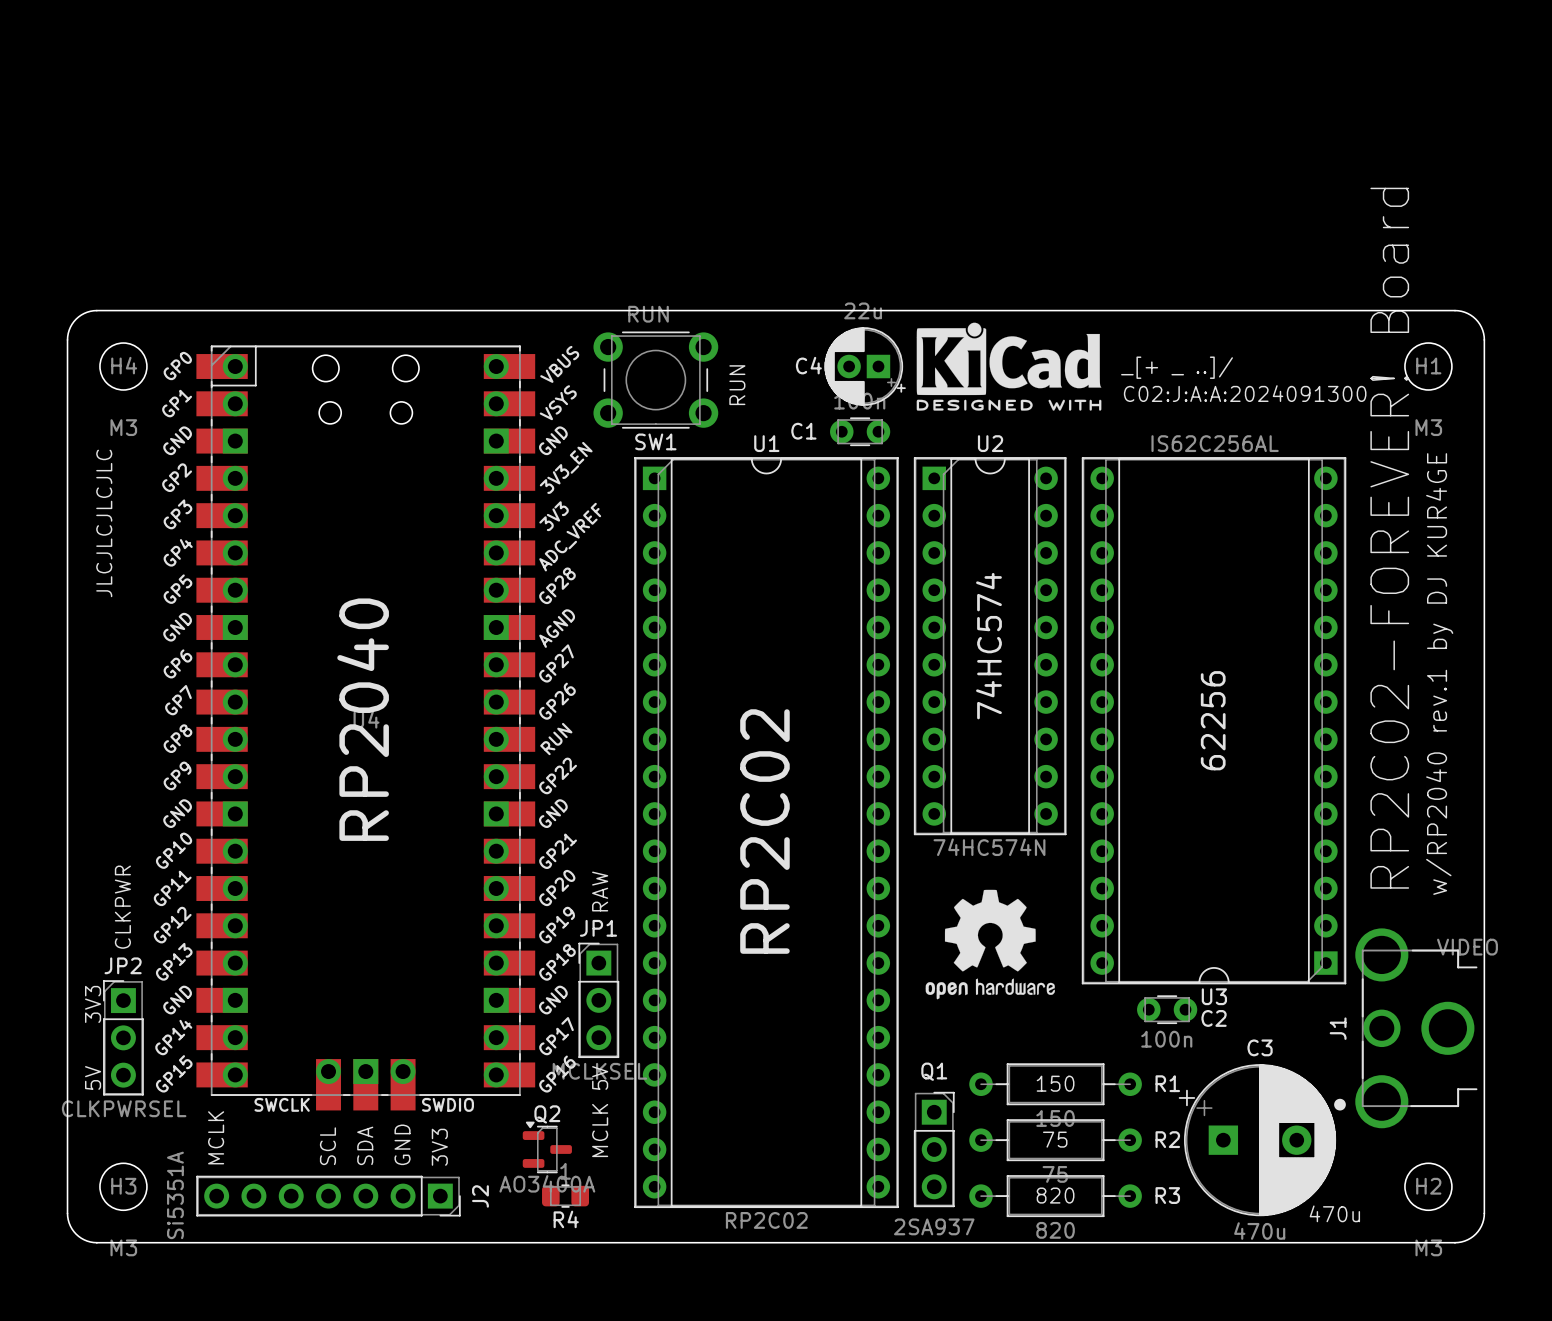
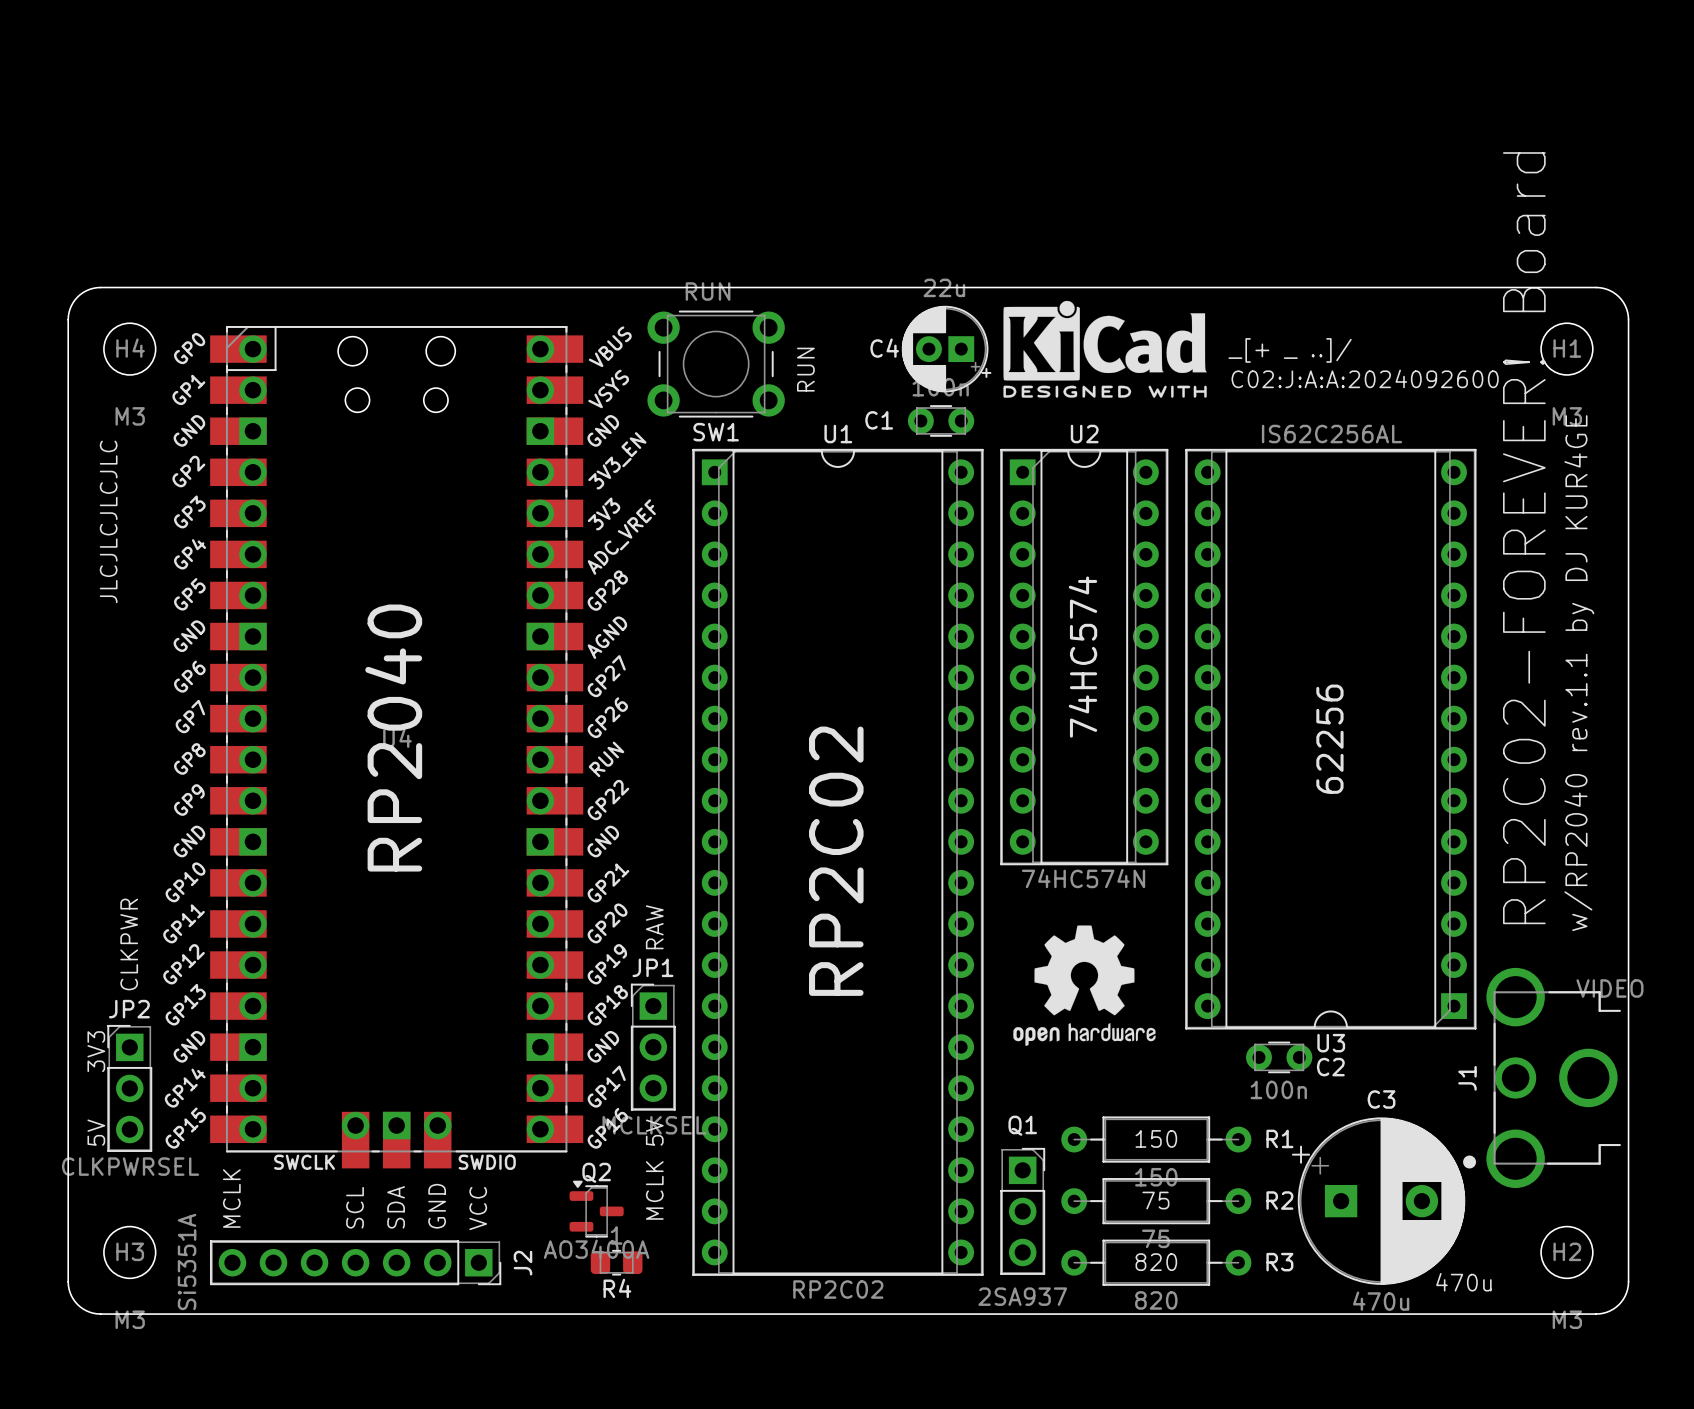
text: C02:J:A:A:2024091300 (1245, 393) -> C02:J:A:A:2024092600 (1365, 378)
text: w/RP2040 rev.1 by DJ KUR4GE (1439, 674) -> w/RP2040 rev.1.1 by DJ KUR4GE (1579, 673)
text: 3V3 (439, 1147) -> VCC (478, 1208)

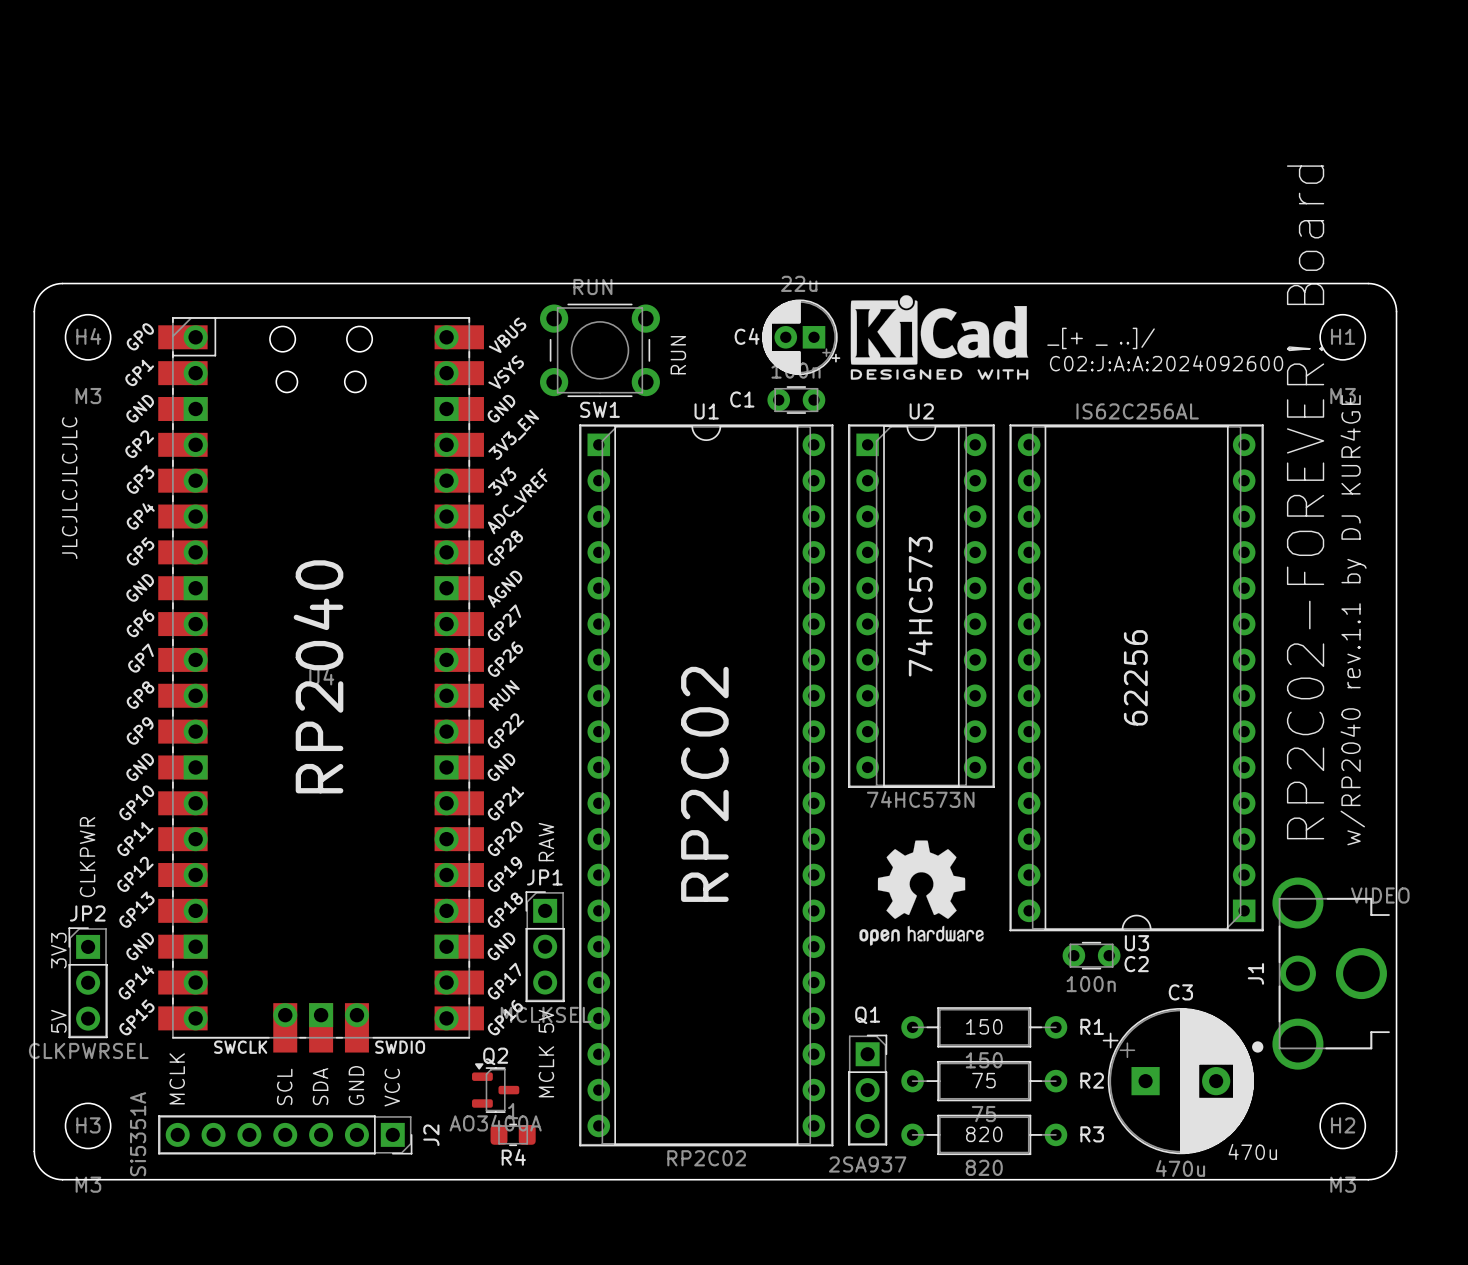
text: 74HC574 (1082, 657) -> 74HC573 (920, 606)
U2 value: 74HC574N (1083, 878) -> 74HC573N (920, 799)

